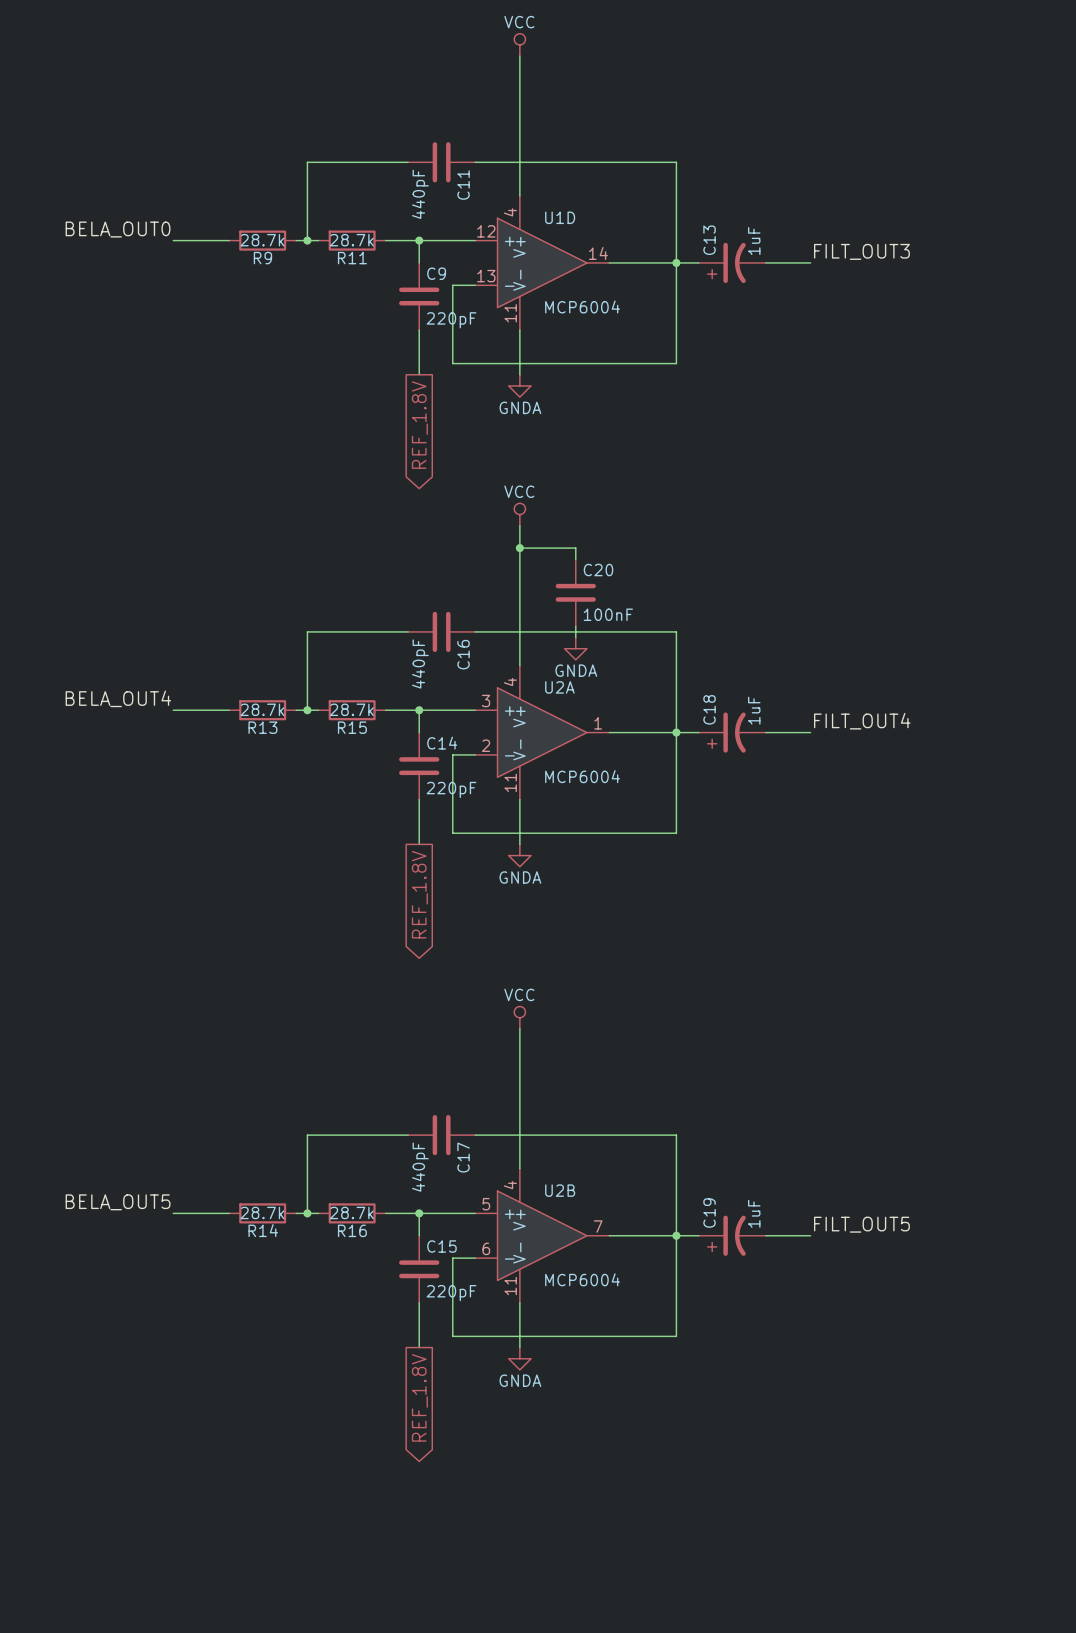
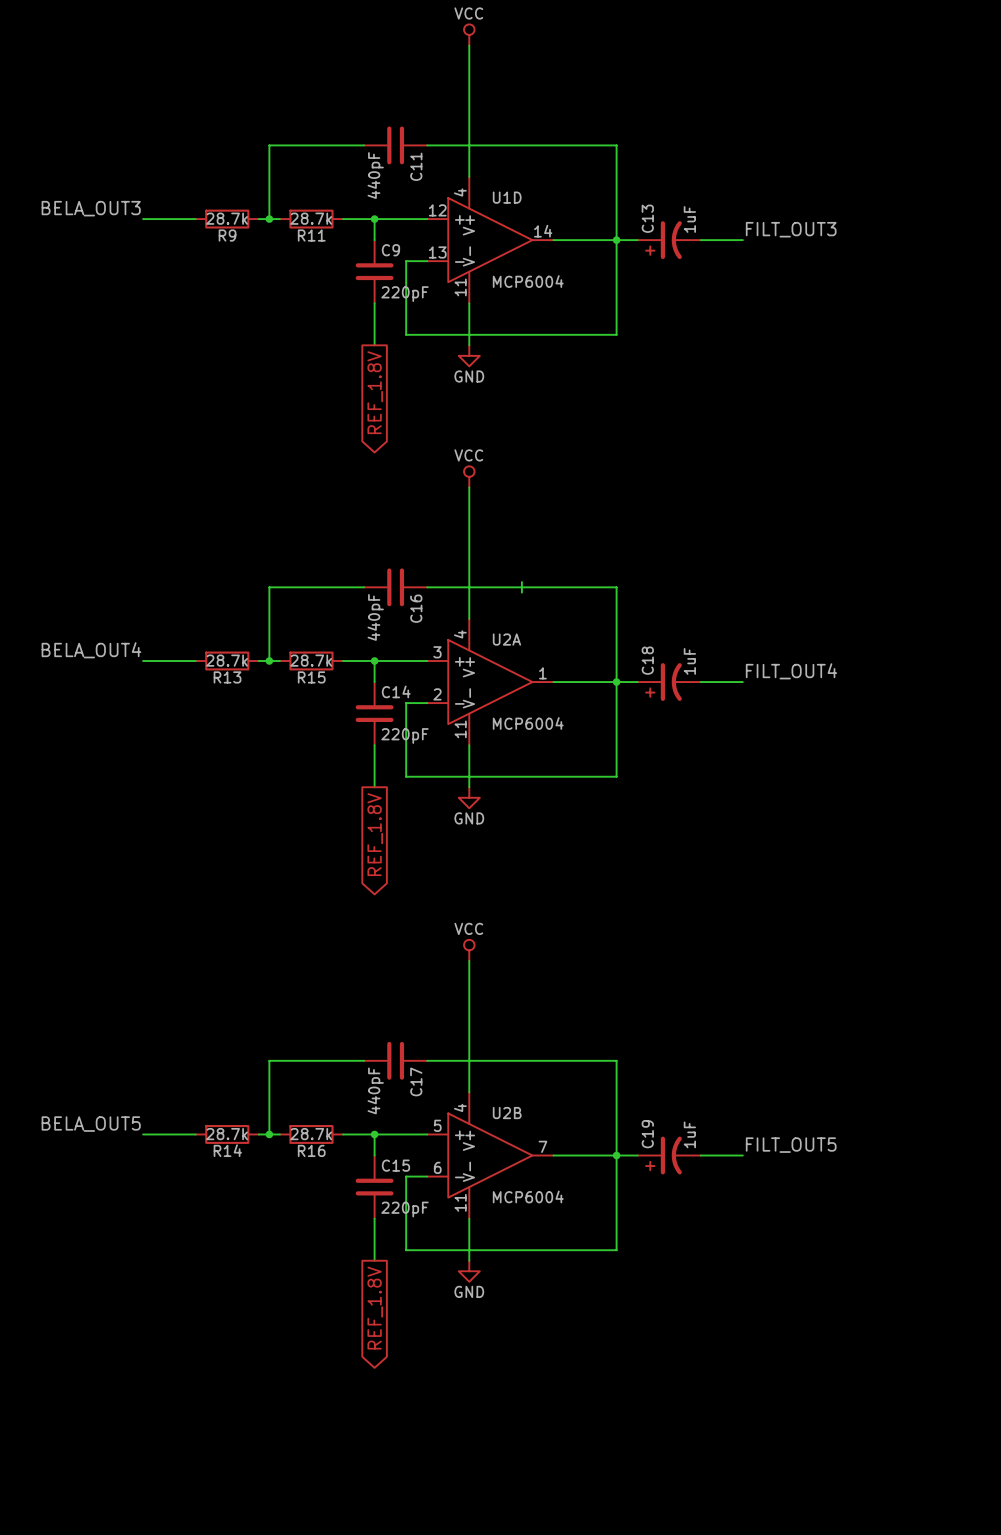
label: BELA_OUT0 (118, 229) -> BELA_OUT3 (91, 208)
power symbol: GNDA (519, 385) -> GND (469, 355)
wire: (519, 548) (575, 548) (575, 559) -> none
junction: (519, 548) -> none
C20: 100nF (575, 592) -> none
power symbol: GNDA (575, 648) -> none
power symbol: GNDA (519, 855) -> GND (469, 797)
power symbol: GNDA (519, 1358) -> GND (469, 1271)

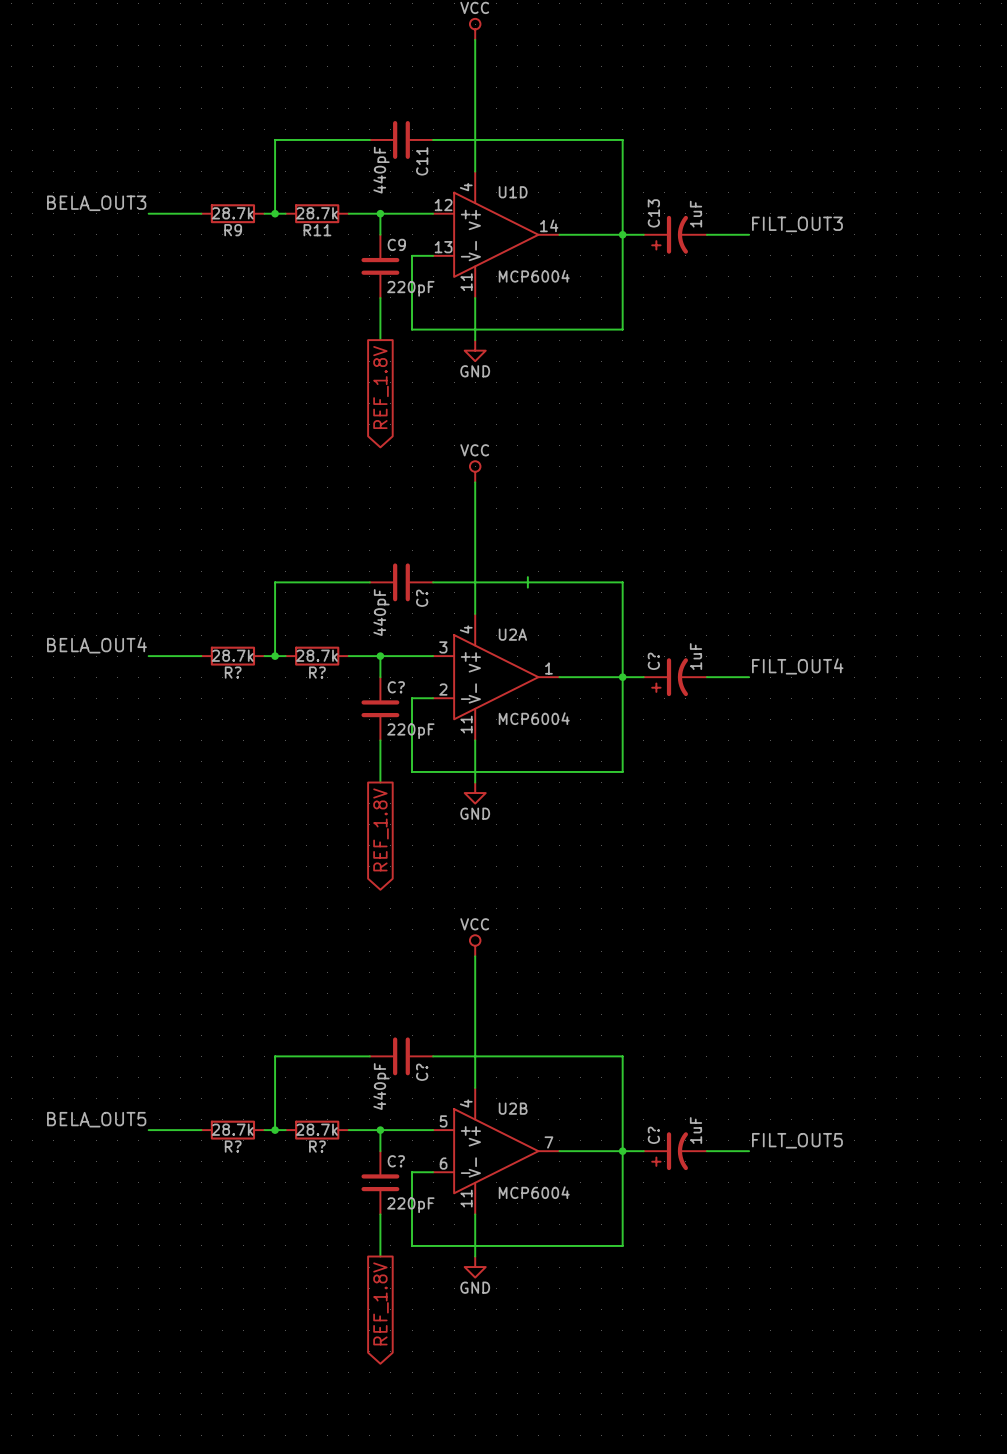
C16 name: C16 (416, 608) -> C? (422, 598)
C18 name: C18 (647, 660) -> C? (653, 661)
R13 name: R13 (227, 677) -> R? (233, 672)
R15 name: R15 (311, 677) -> R? (317, 672)
C14 name: C14 (396, 691) -> C? (396, 687)
C17 name: C17 (416, 1081) -> C? (422, 1072)
C19 name: C19 (647, 1134) -> C? (653, 1135)
R14 name: R14 (227, 1150) -> R? (233, 1146)
R16 name: R16 (311, 1150) -> R? (317, 1146)
C15 name: C15 (395, 1165) -> C? (396, 1161)

